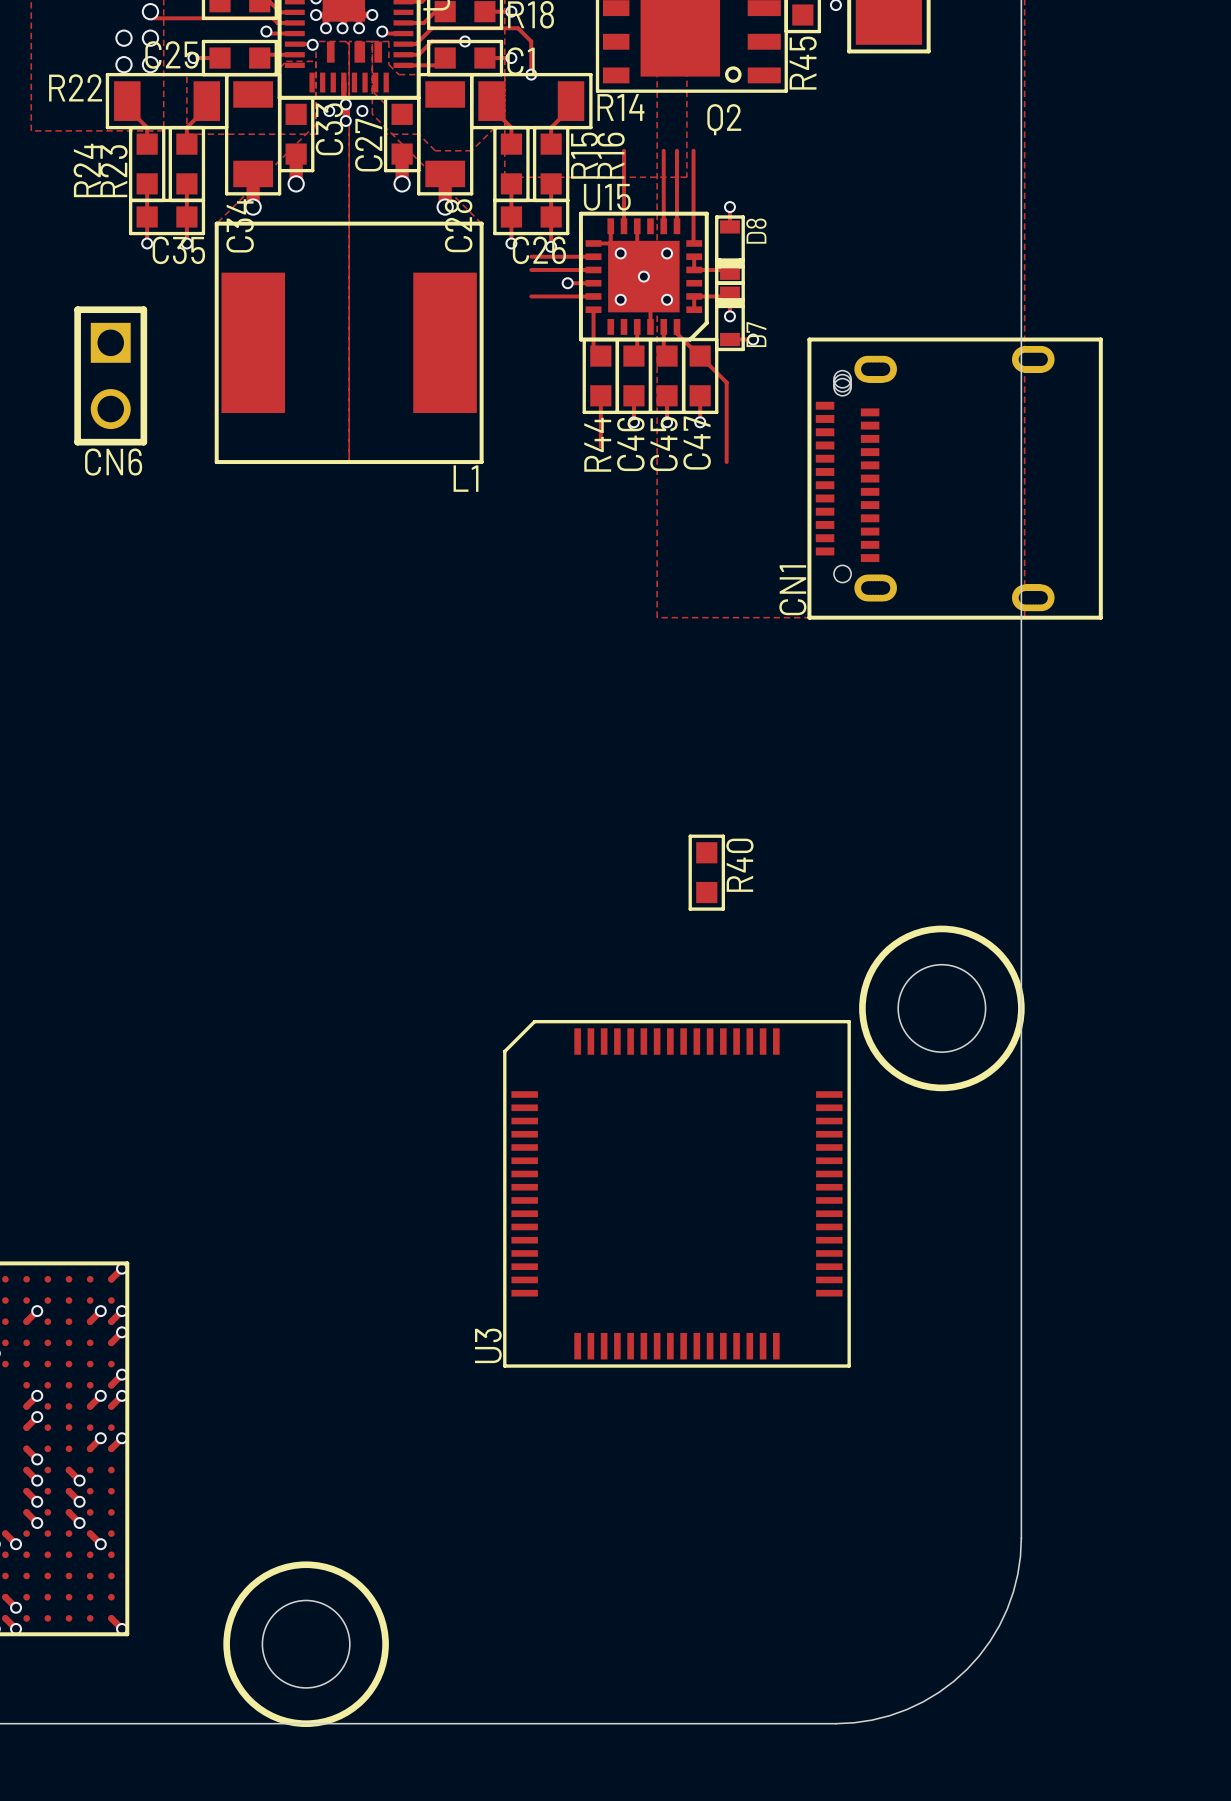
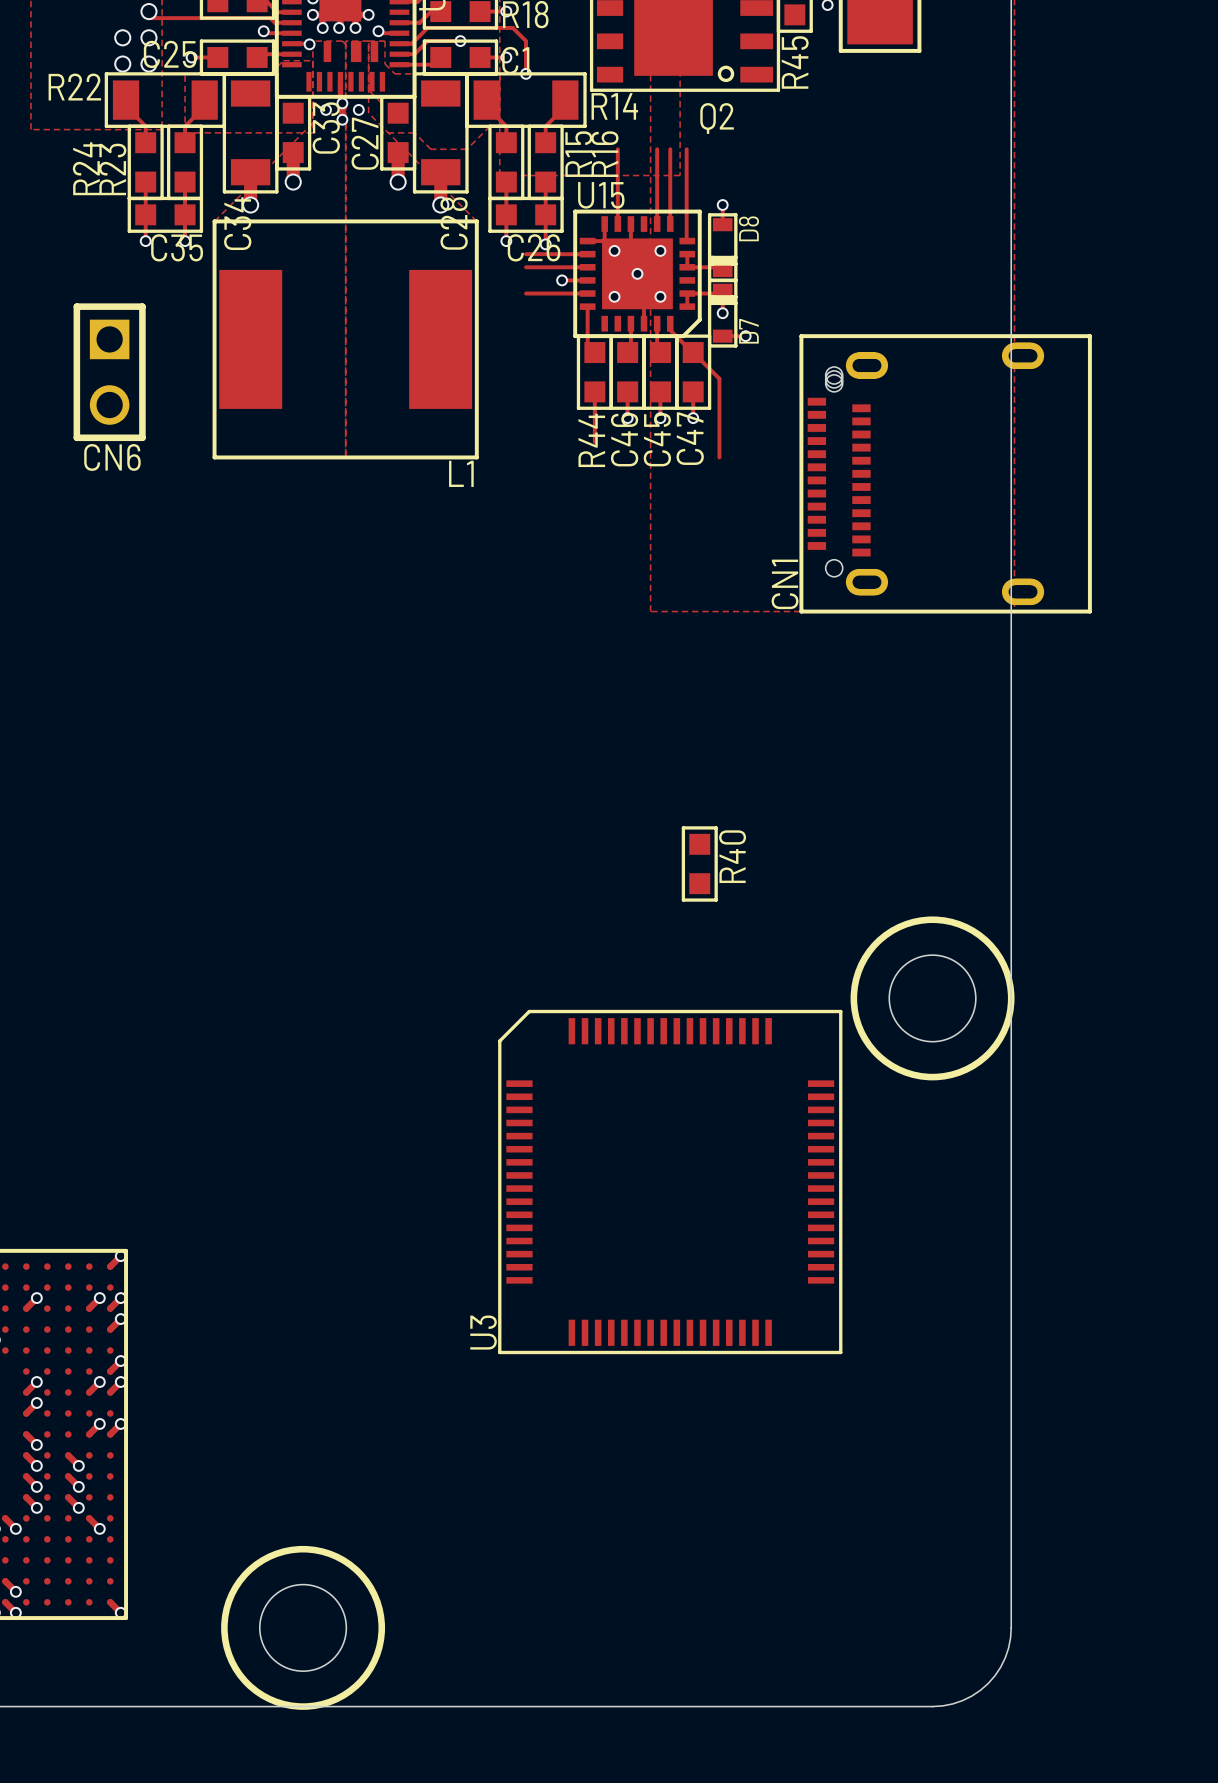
board edge: (1021, 1538) (1017, 1574) (1007, 1609) (990, 1641) (967, 1669) (938, 1692) (906, 1709) (872, 1720) (835, 1723) -> (1011, 1522) (1010, 1638) (1000, 1667) (988, 1683) (971, 1696) (942, 1705) (827, 1706)

